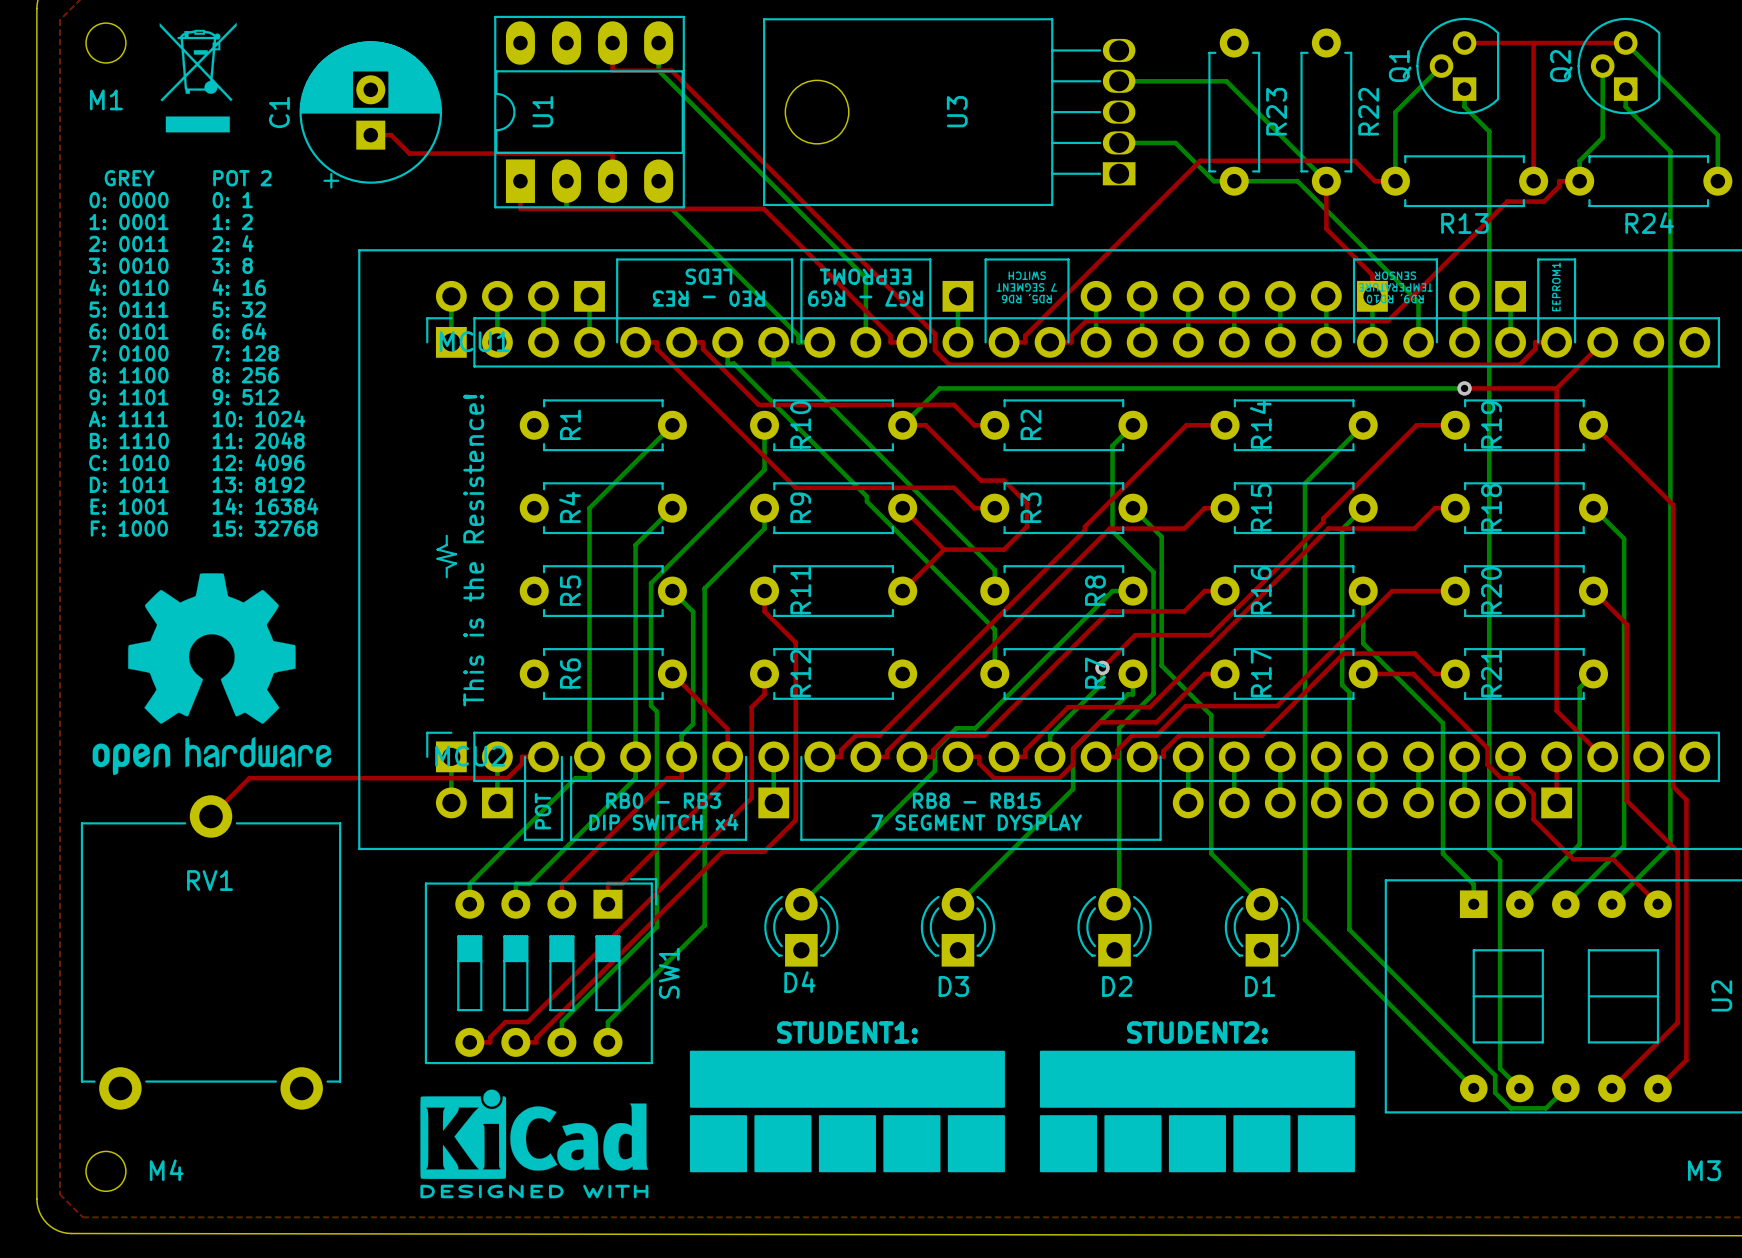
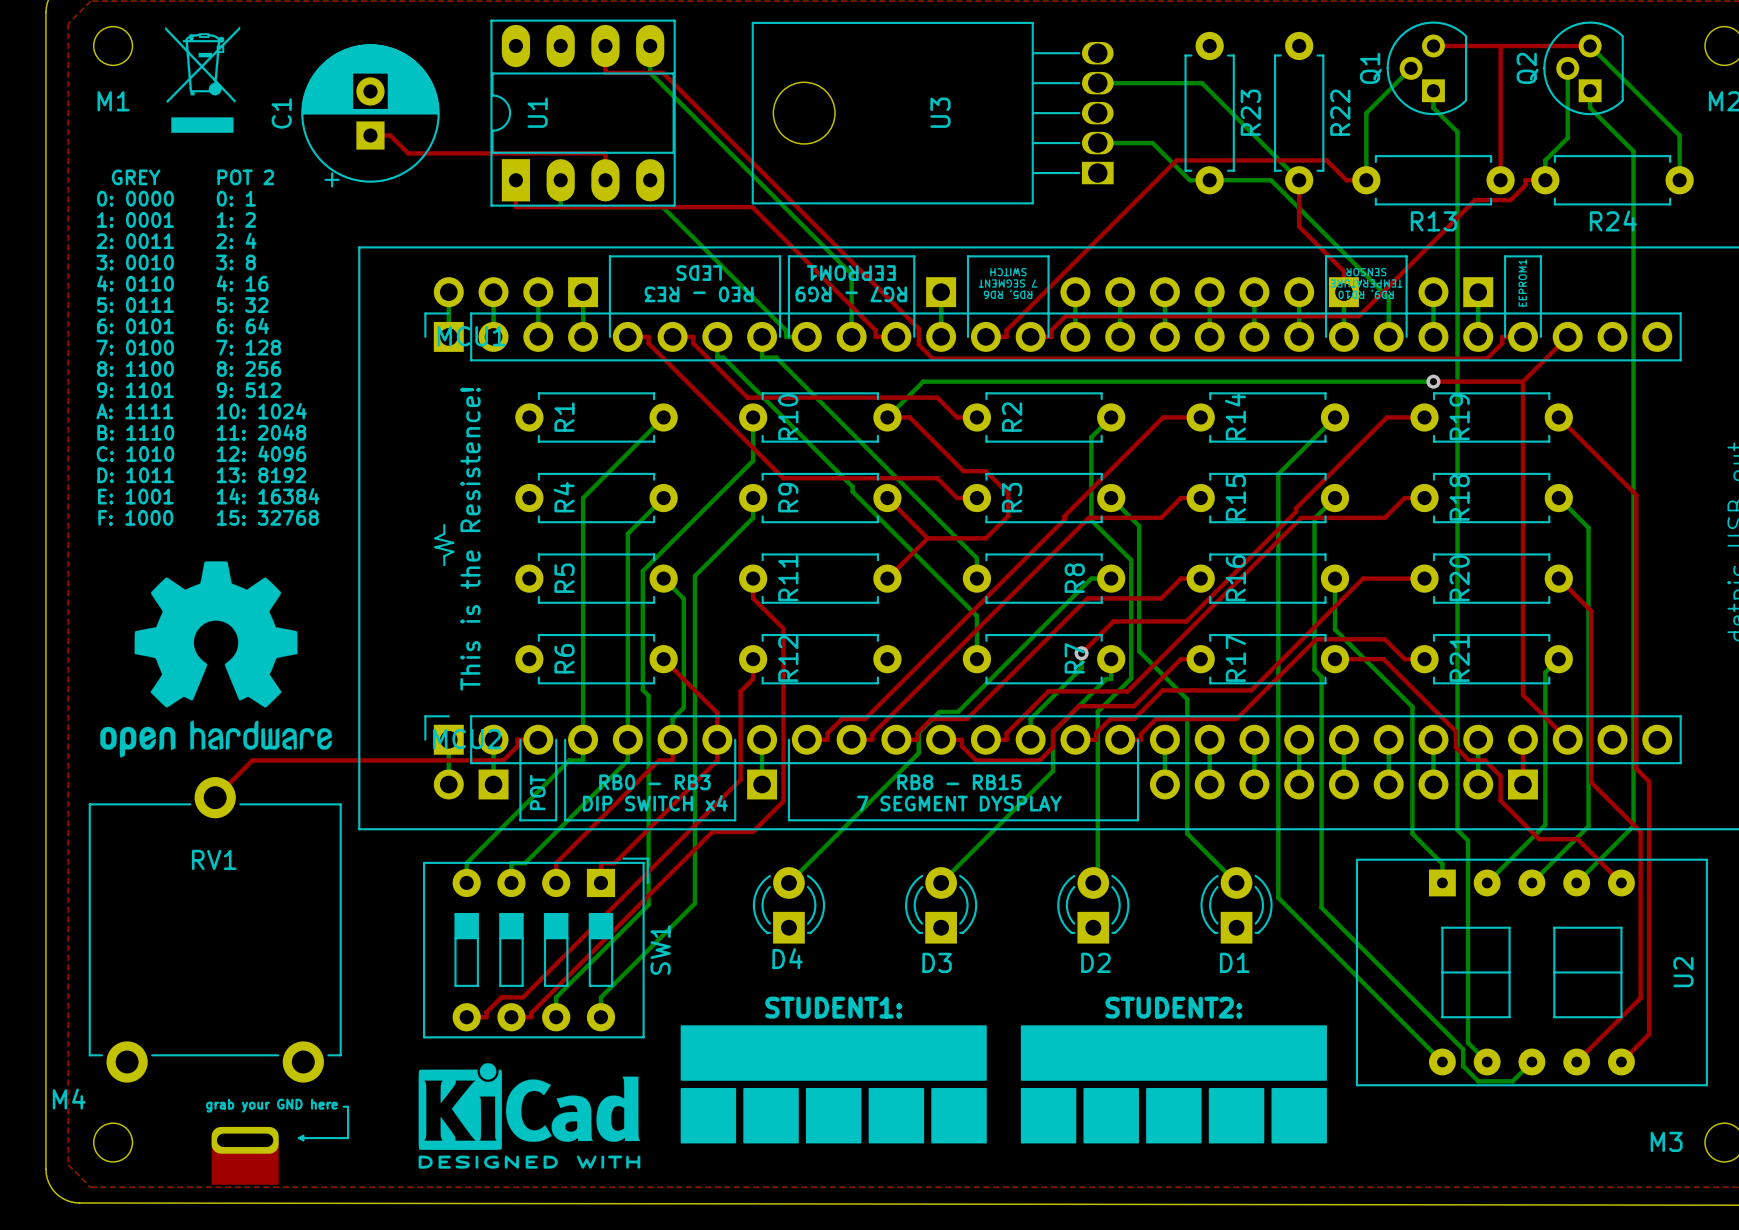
line: none -> (343, 1106) (348, 1106) (348, 1138) (303, 1138)
line: none -> (303, 1135) (303, 1140) (298, 1138) (303, 1135)
M4 name position: M4 (166, 1170) -> M4 (69, 1098)
grab your GND here: none -> (245, 1155)

